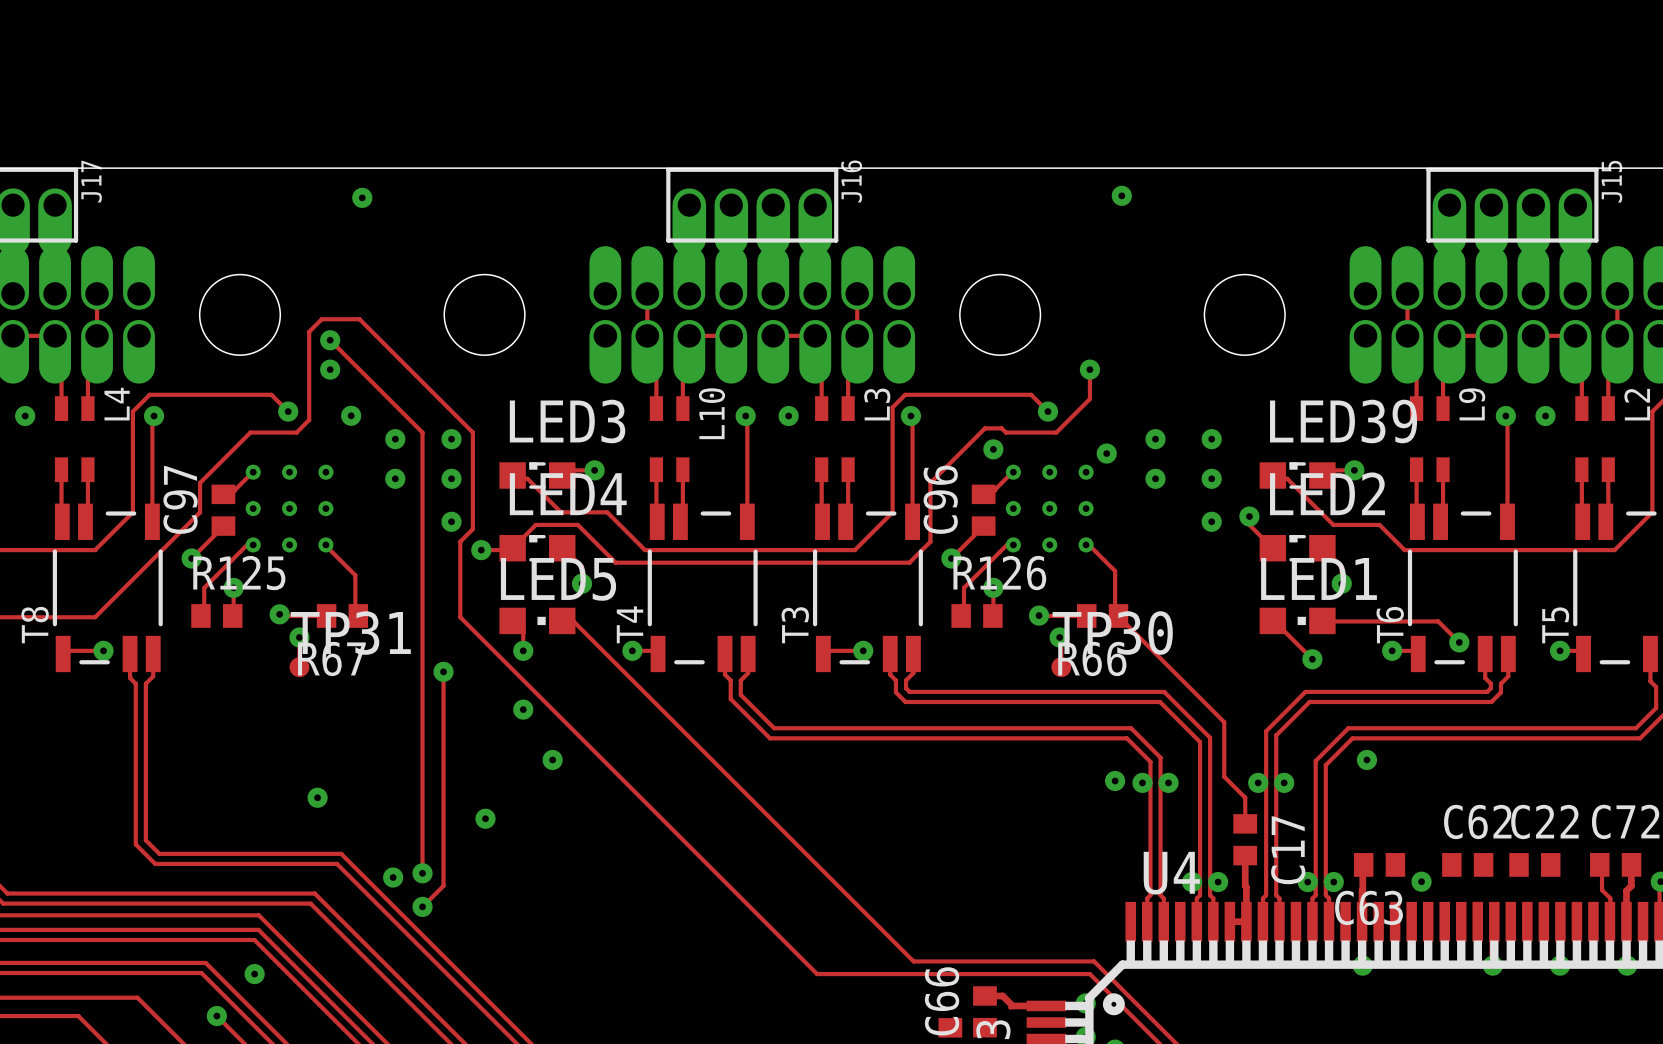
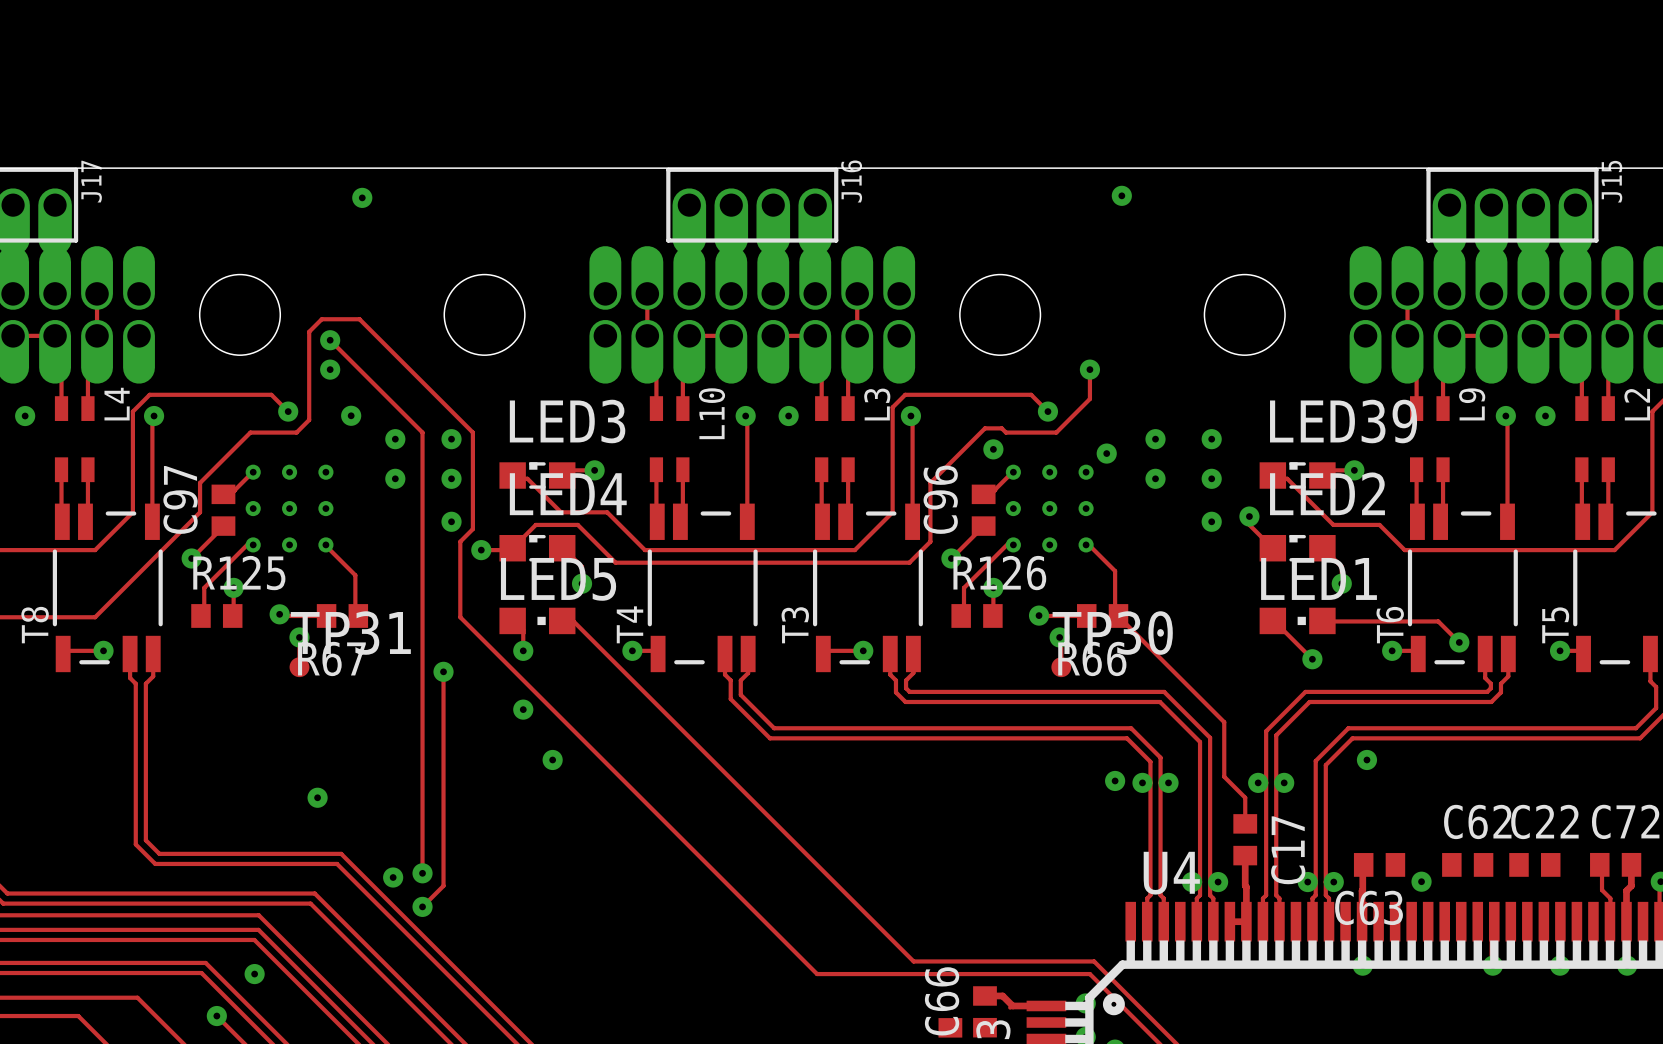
via: (485, 818) -> none

